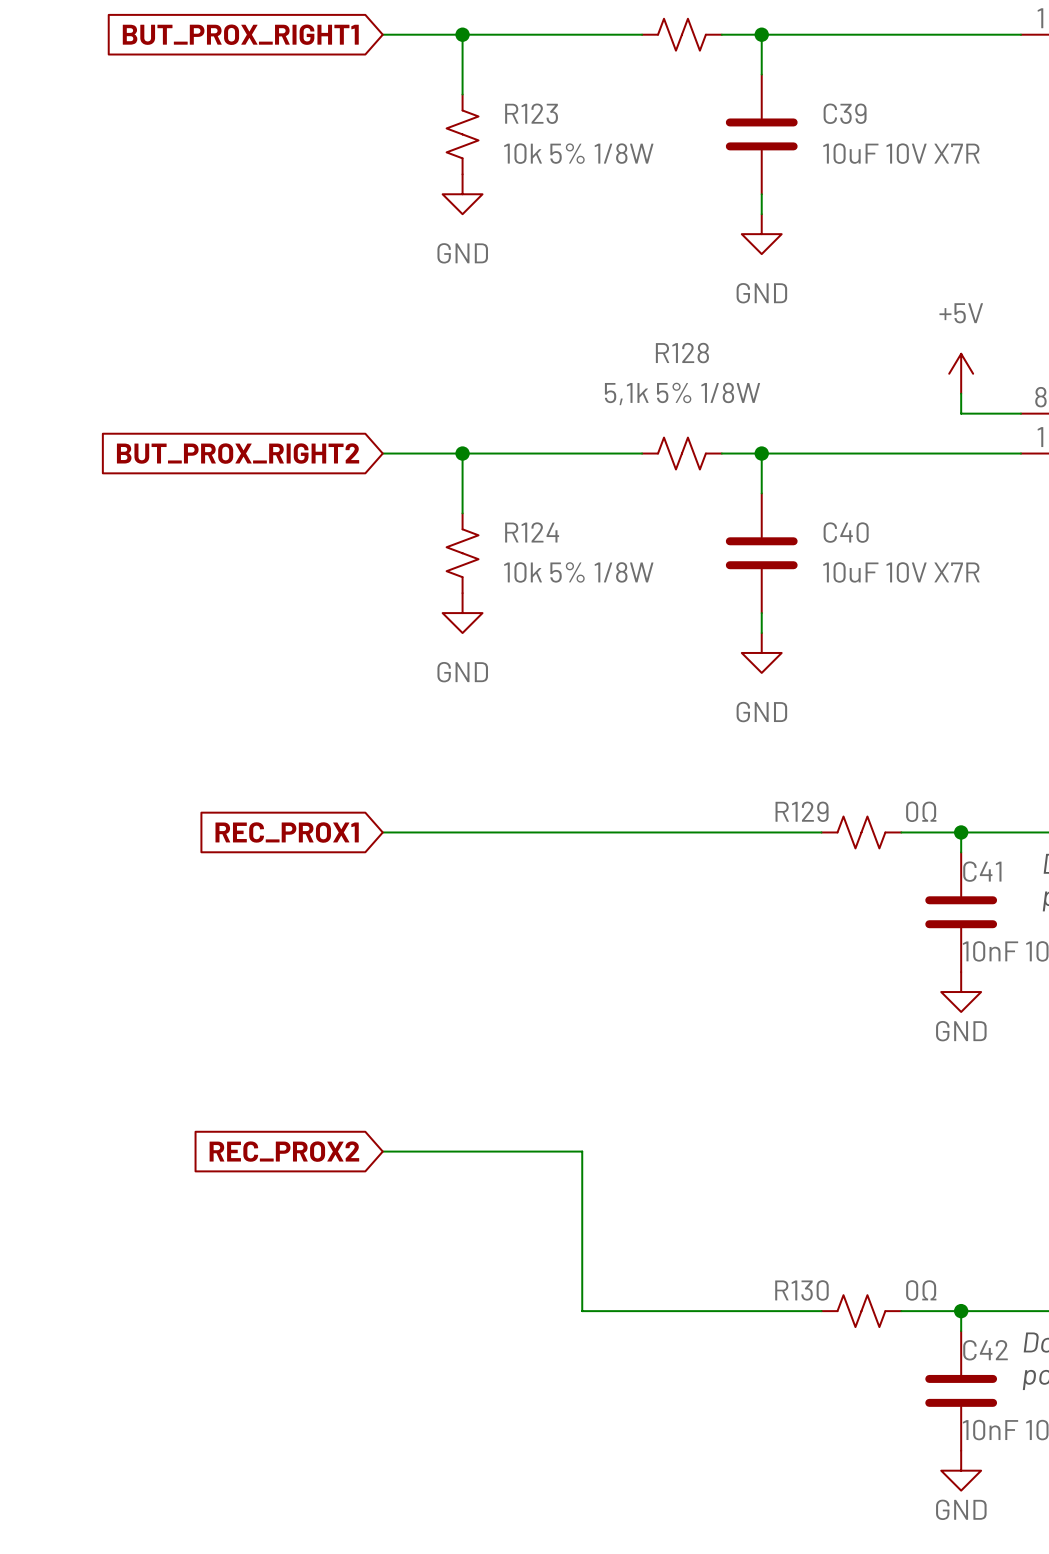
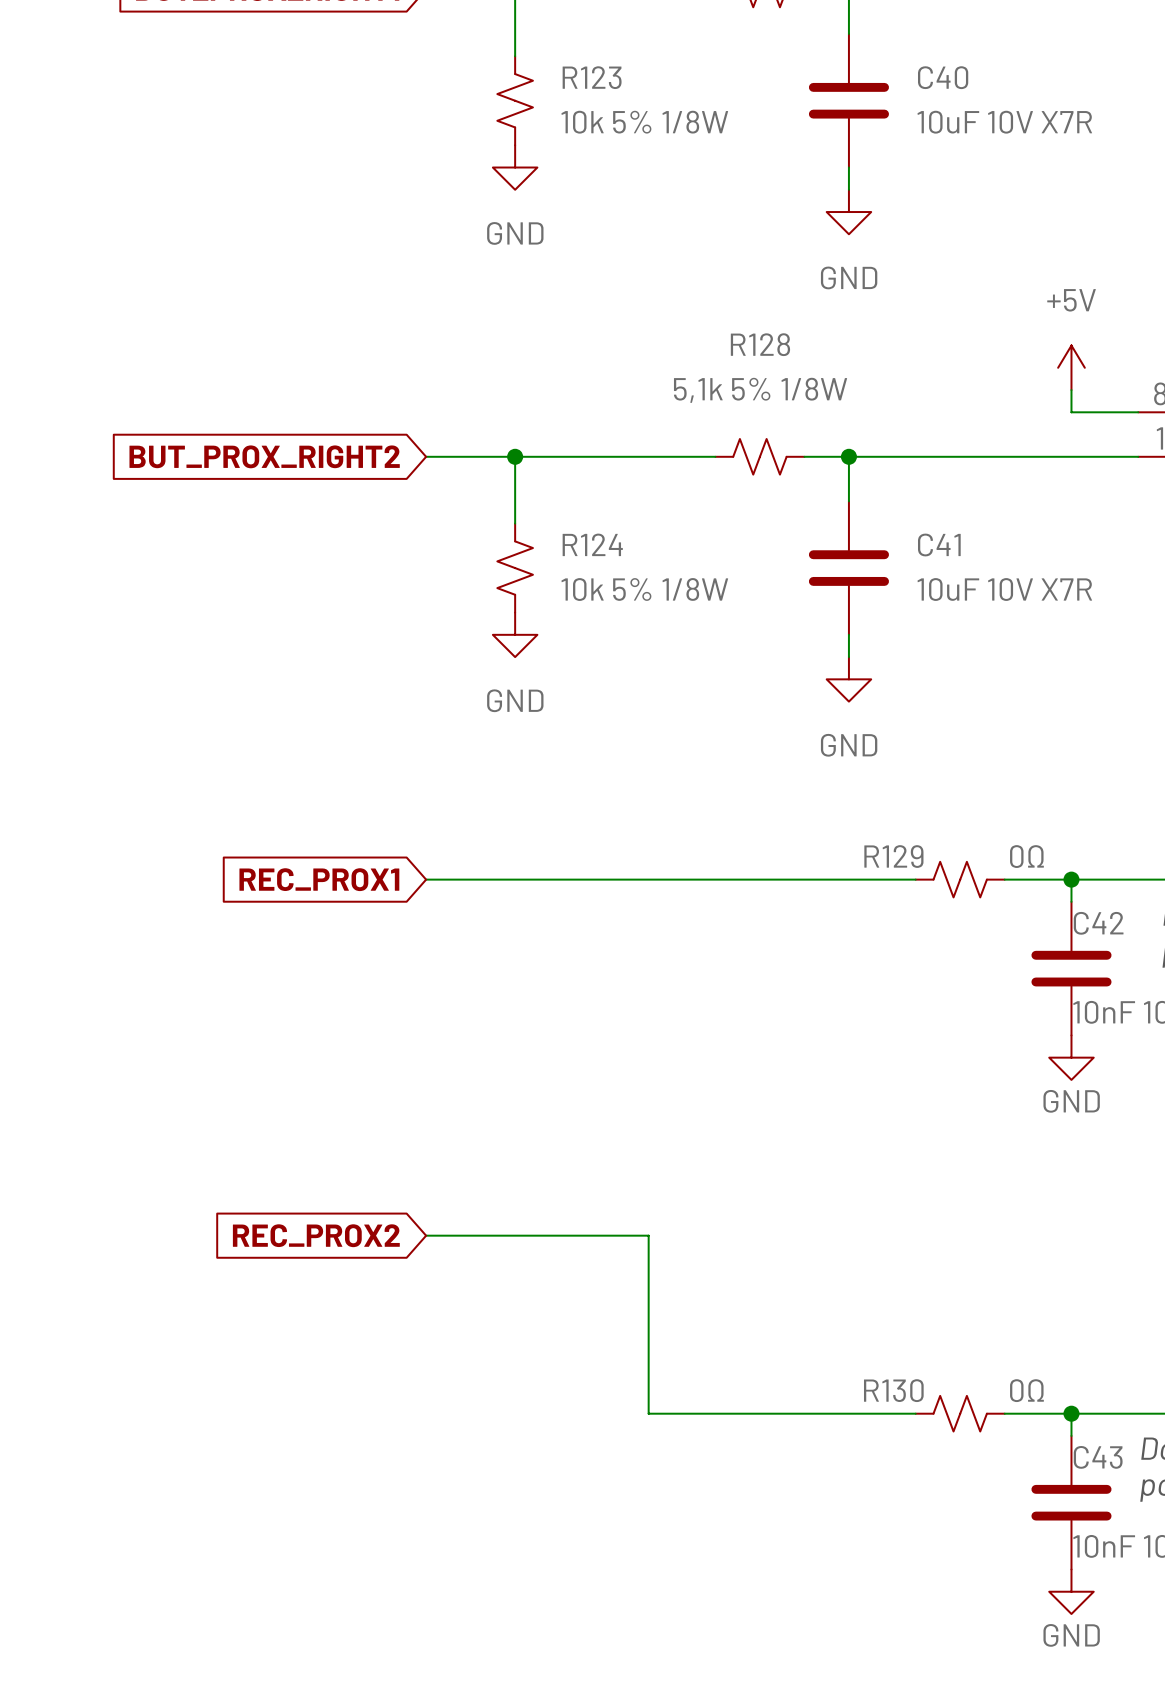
C39 name: C39 (845, 113) -> C40 (943, 77)
C40 name: C40 (846, 532) -> C41 (939, 545)
C41 name: C41 (982, 871) -> C42 (1098, 923)
C42 name: C42 (985, 1350) -> C43 (1098, 1457)

